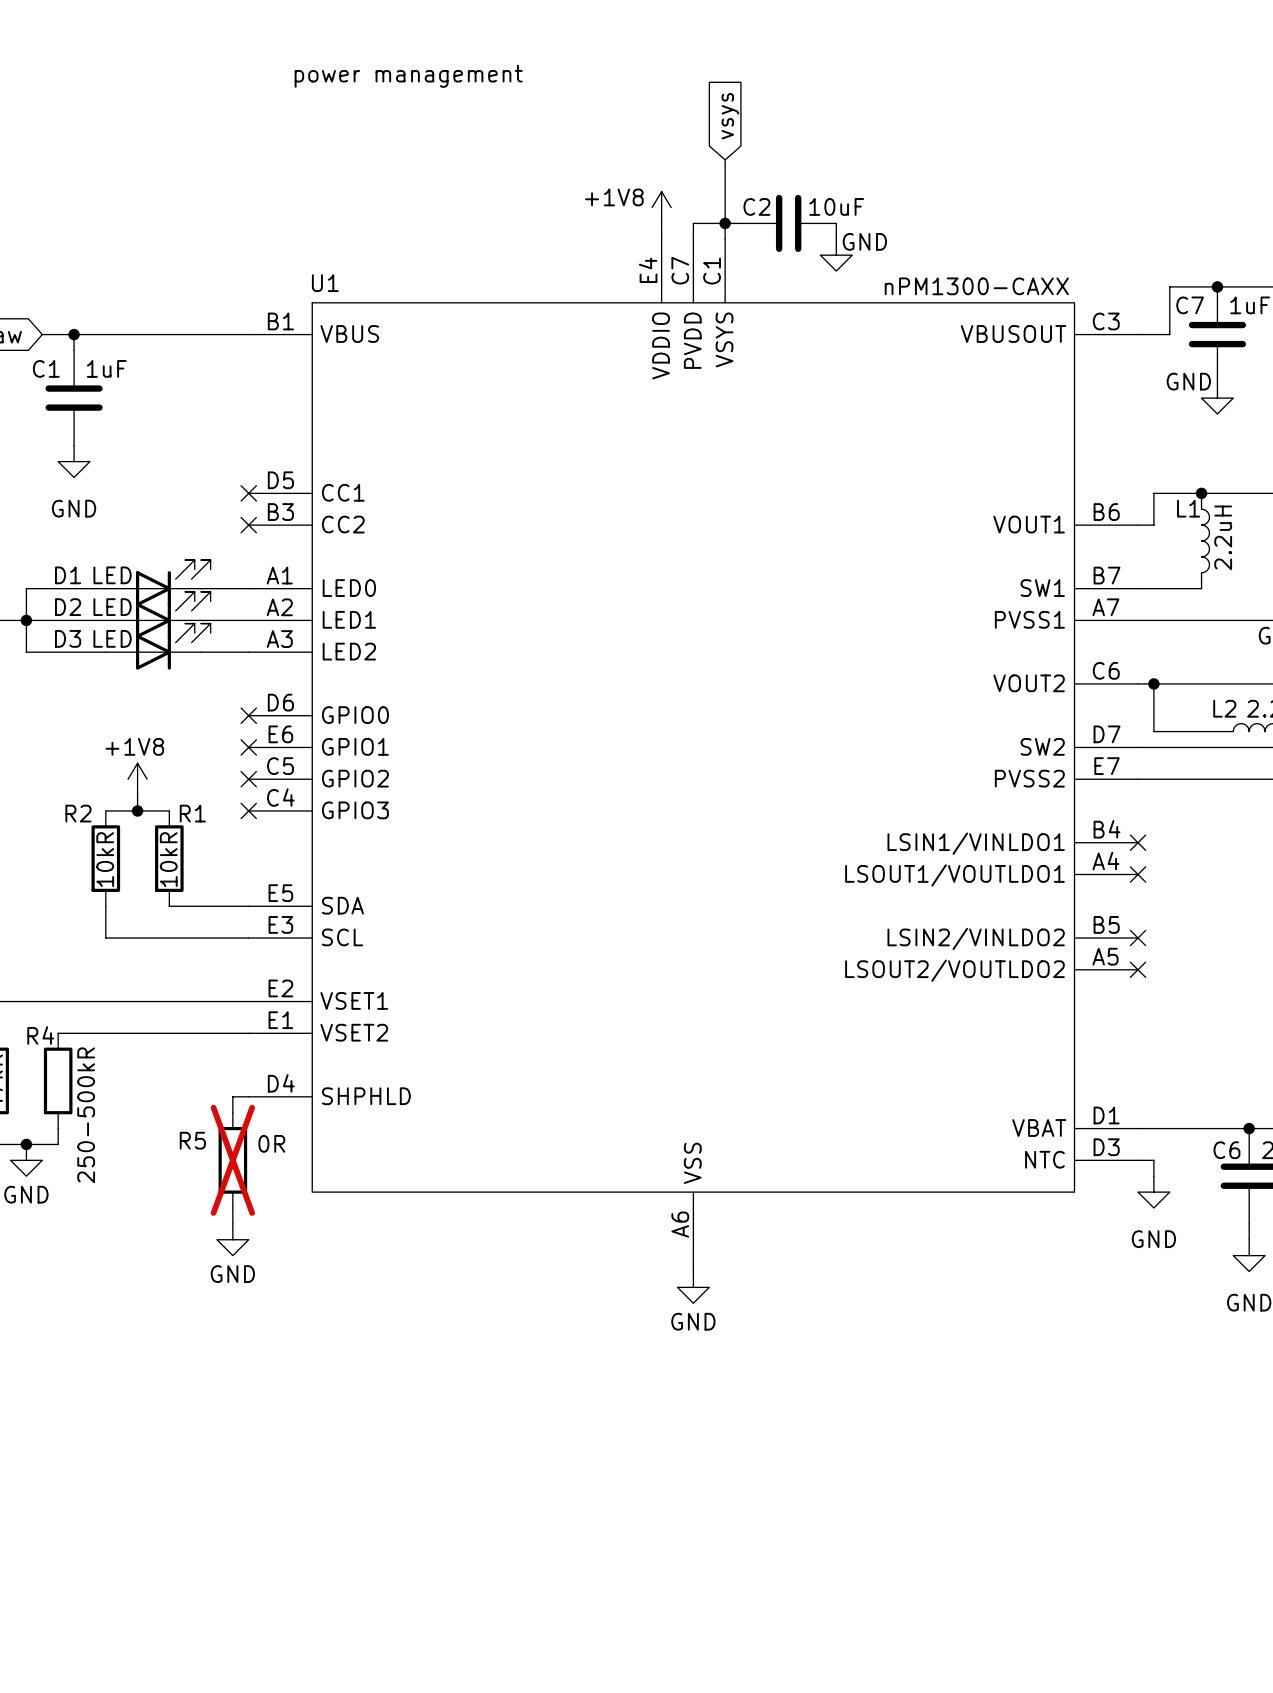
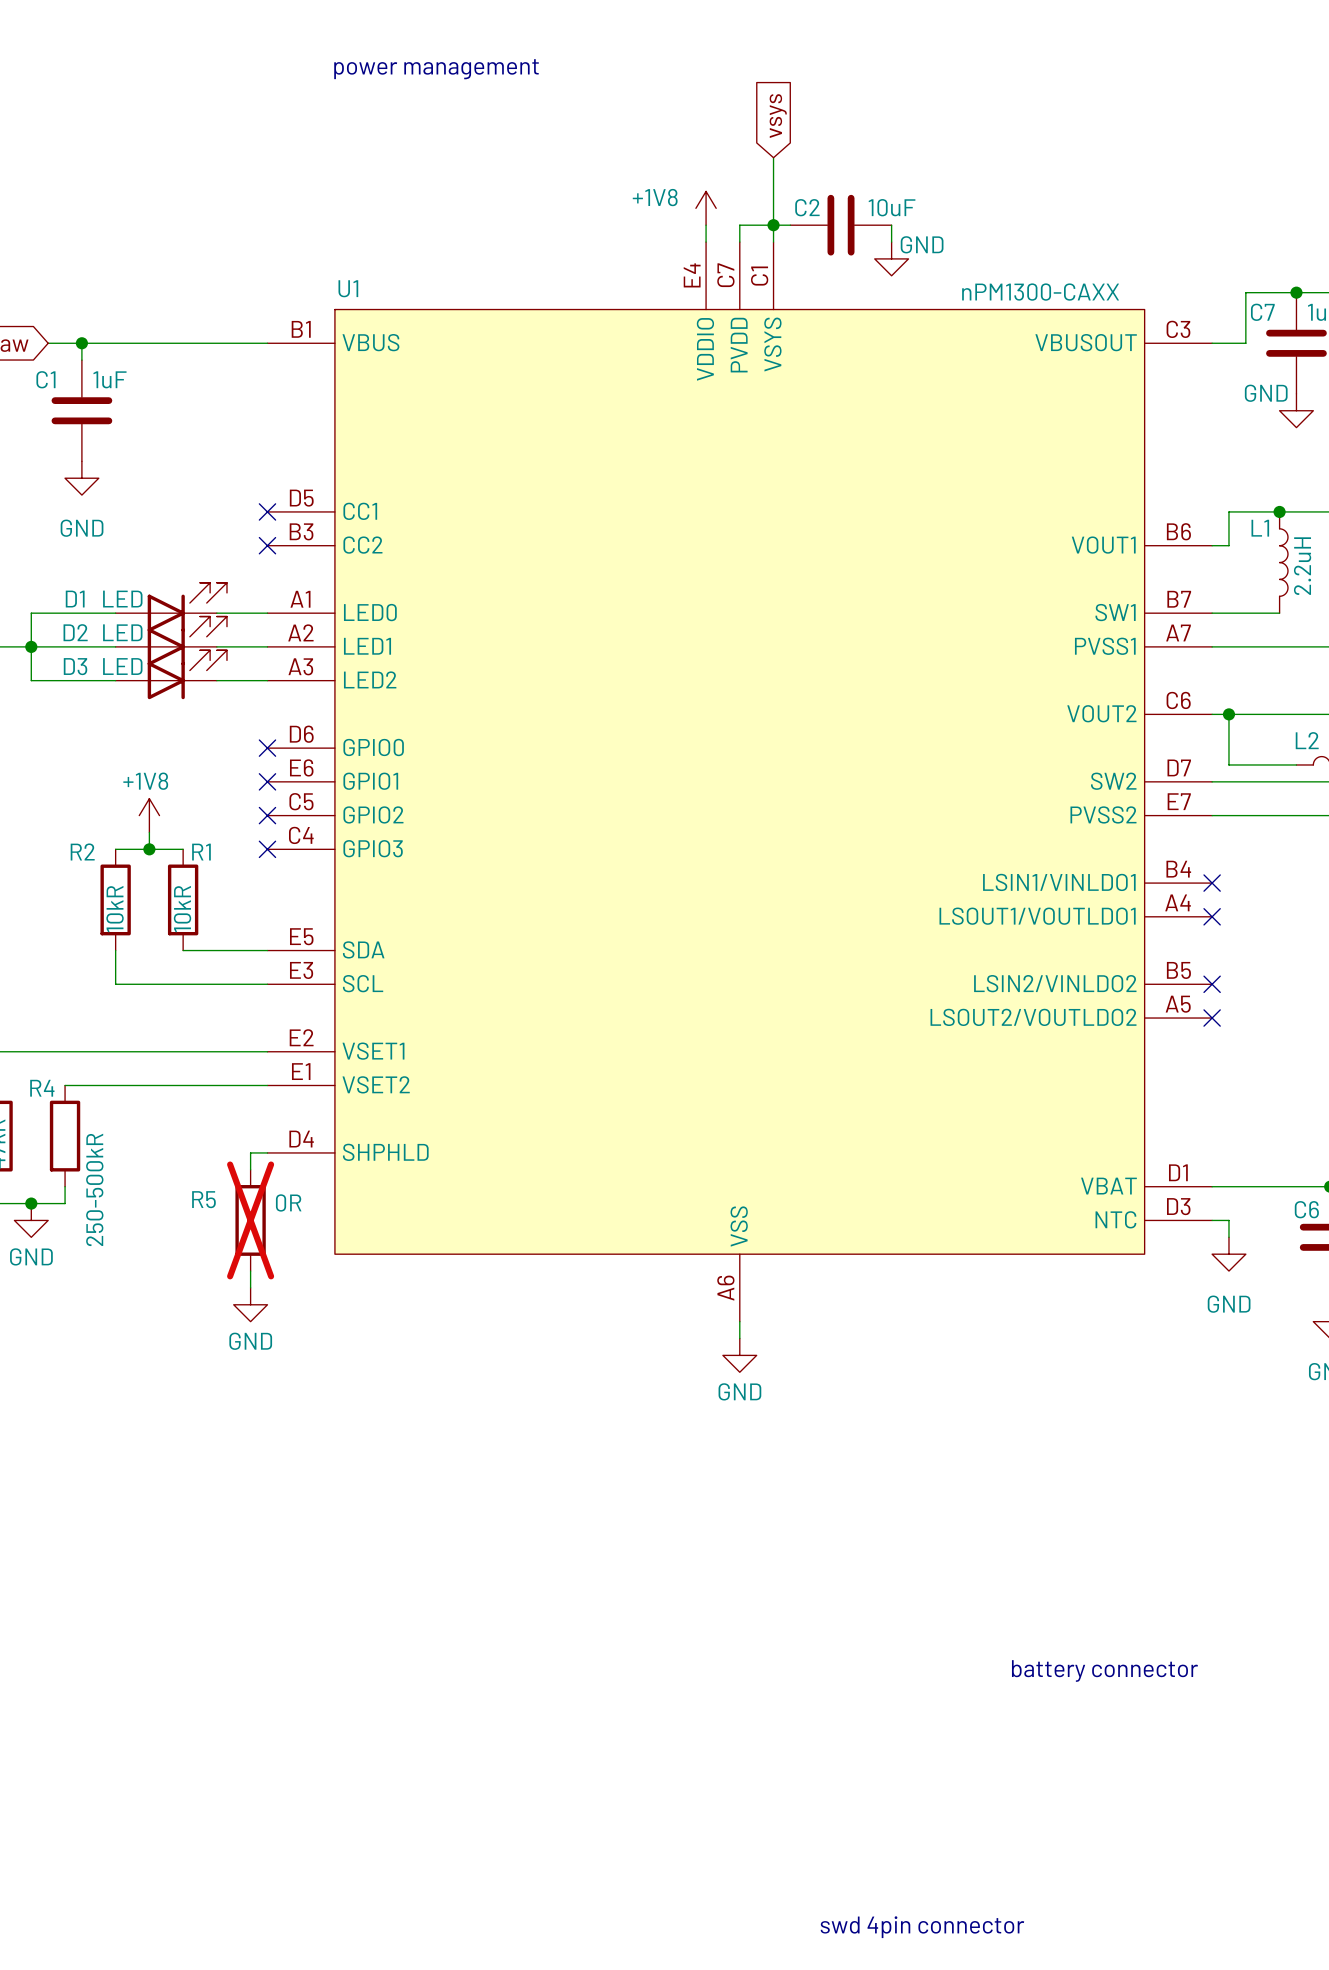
text: none -> battery connector (1104, 1670)

